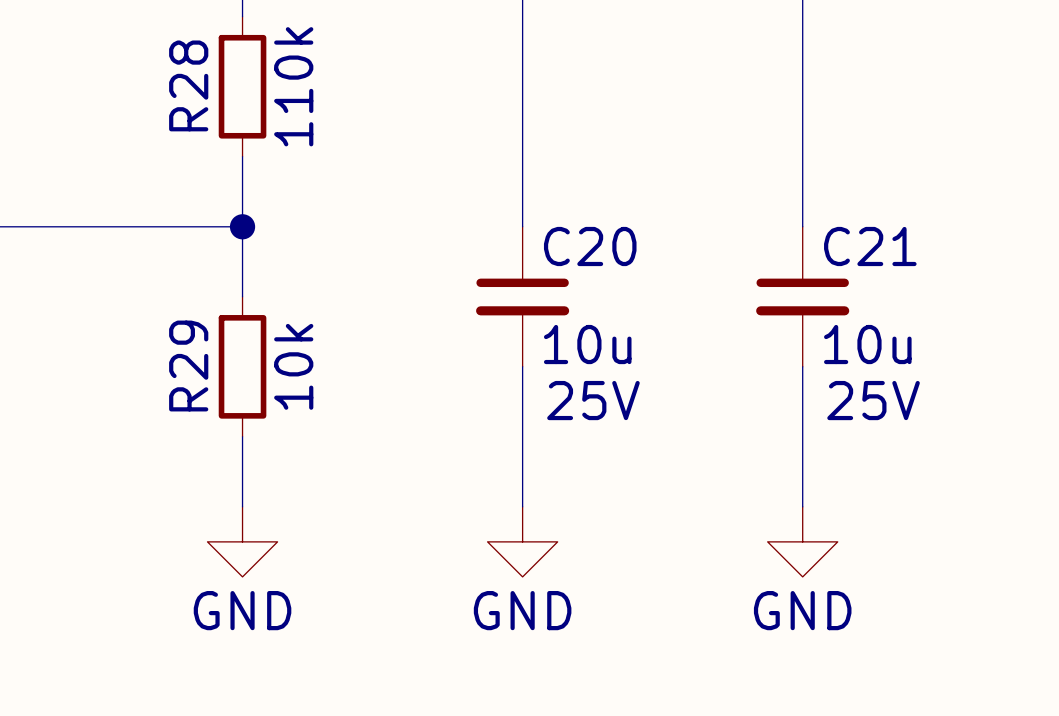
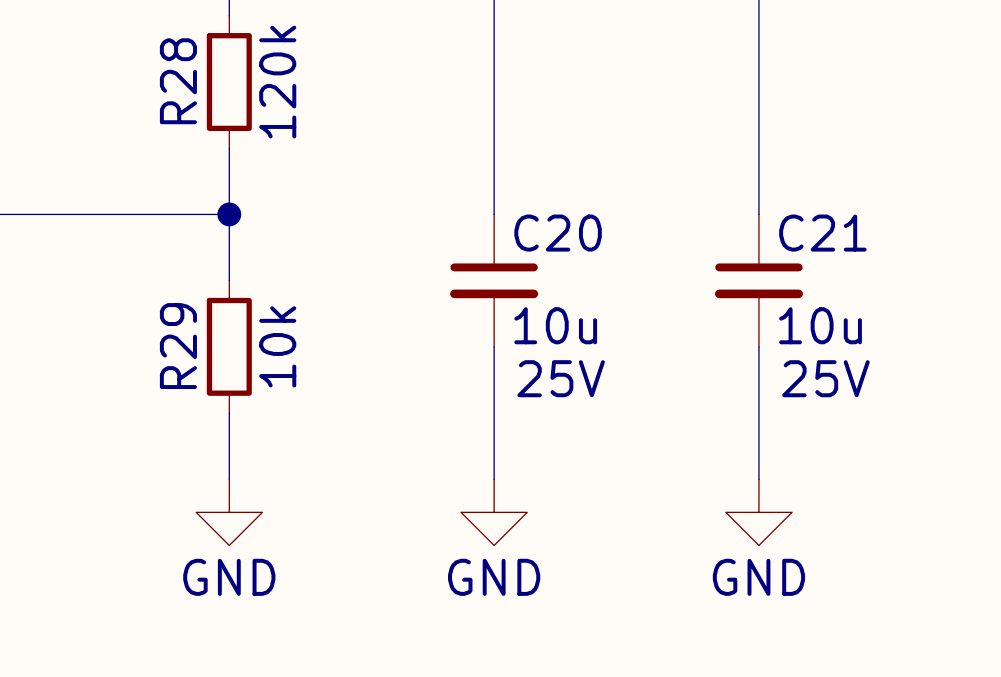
R28 value: 110k (293, 86) -> 120k (277, 82)

